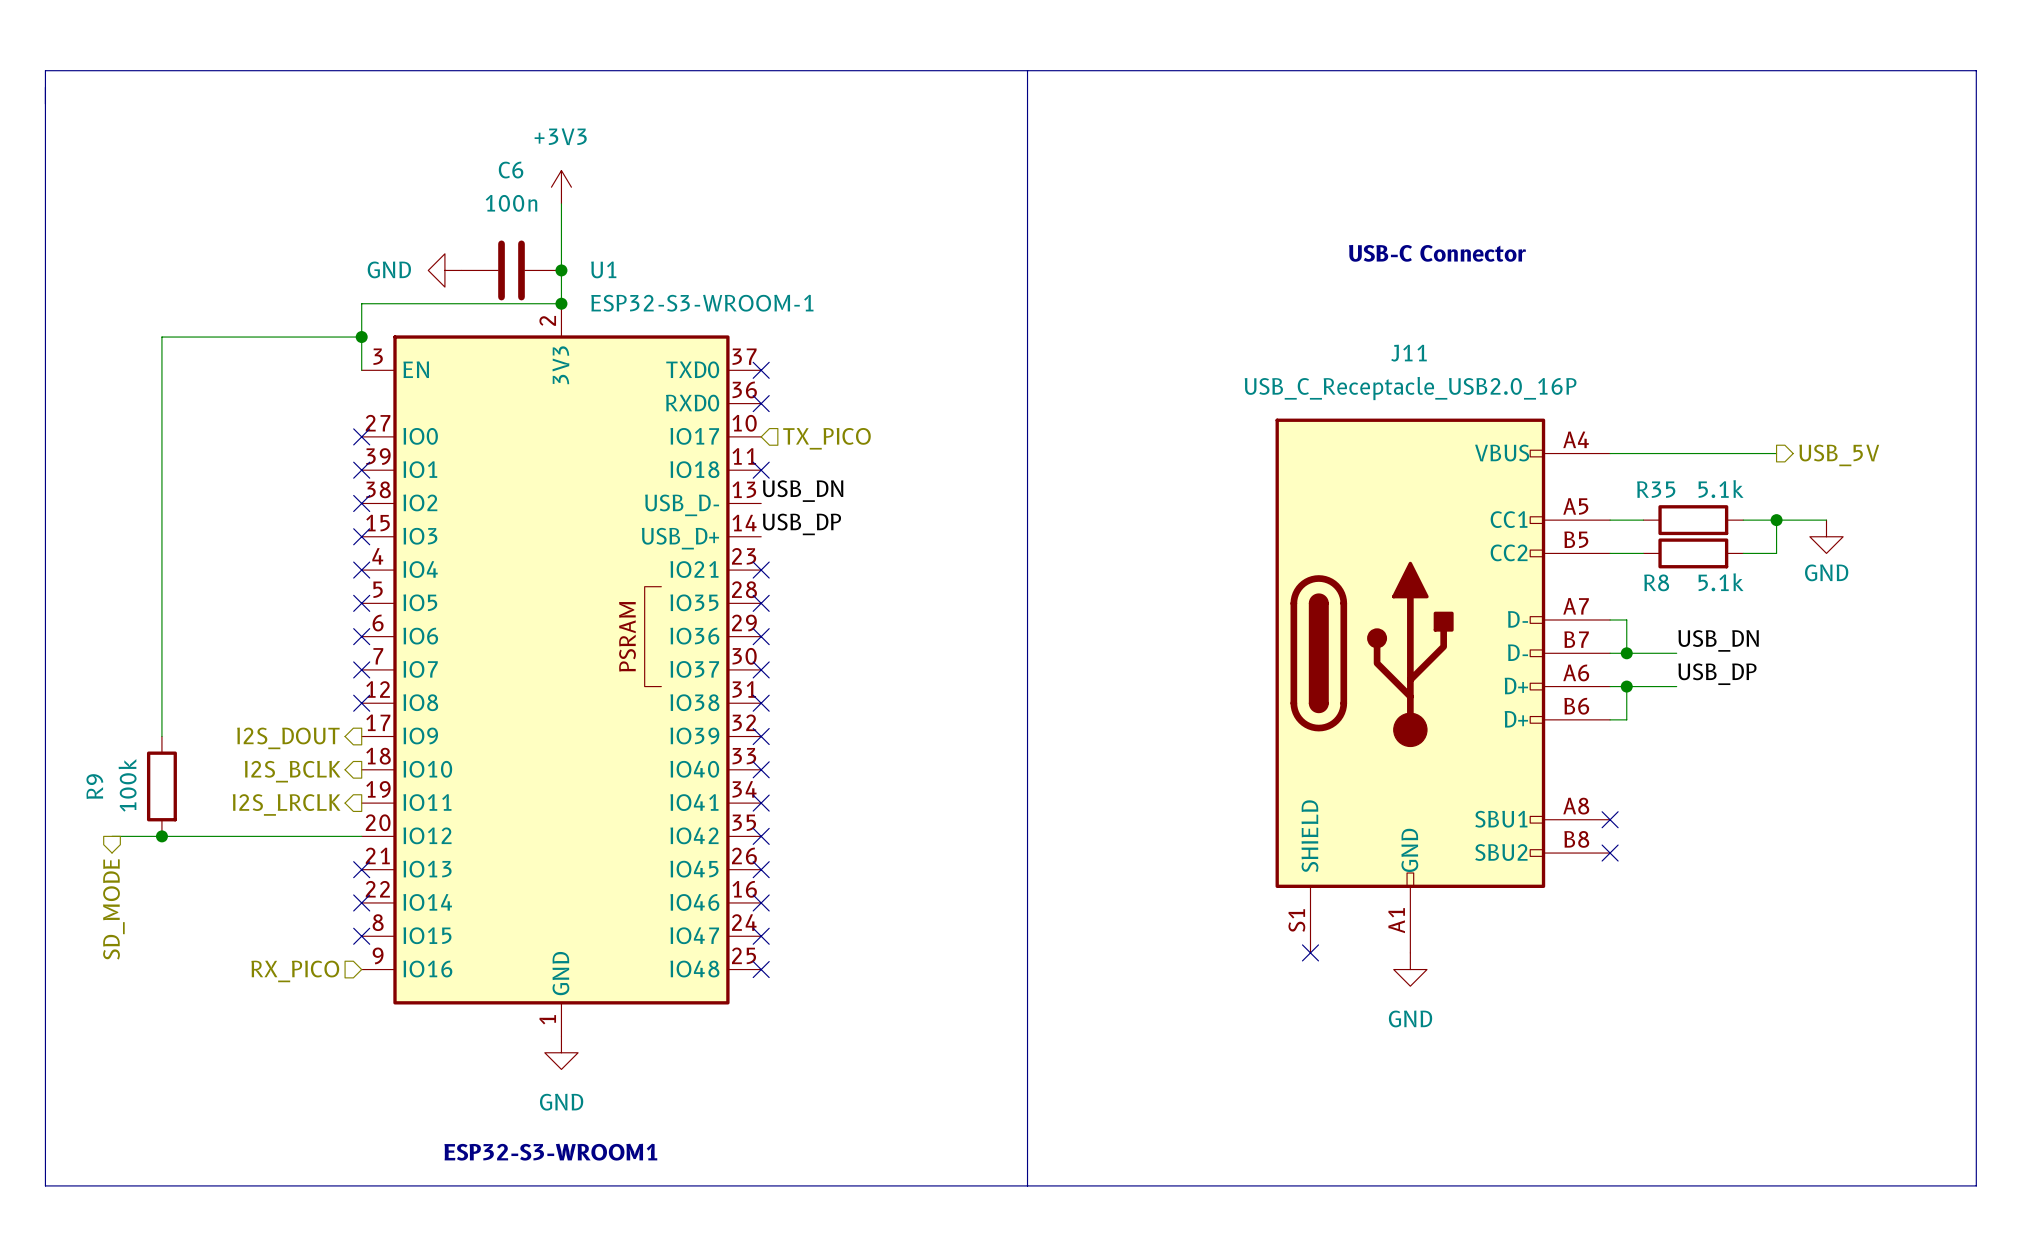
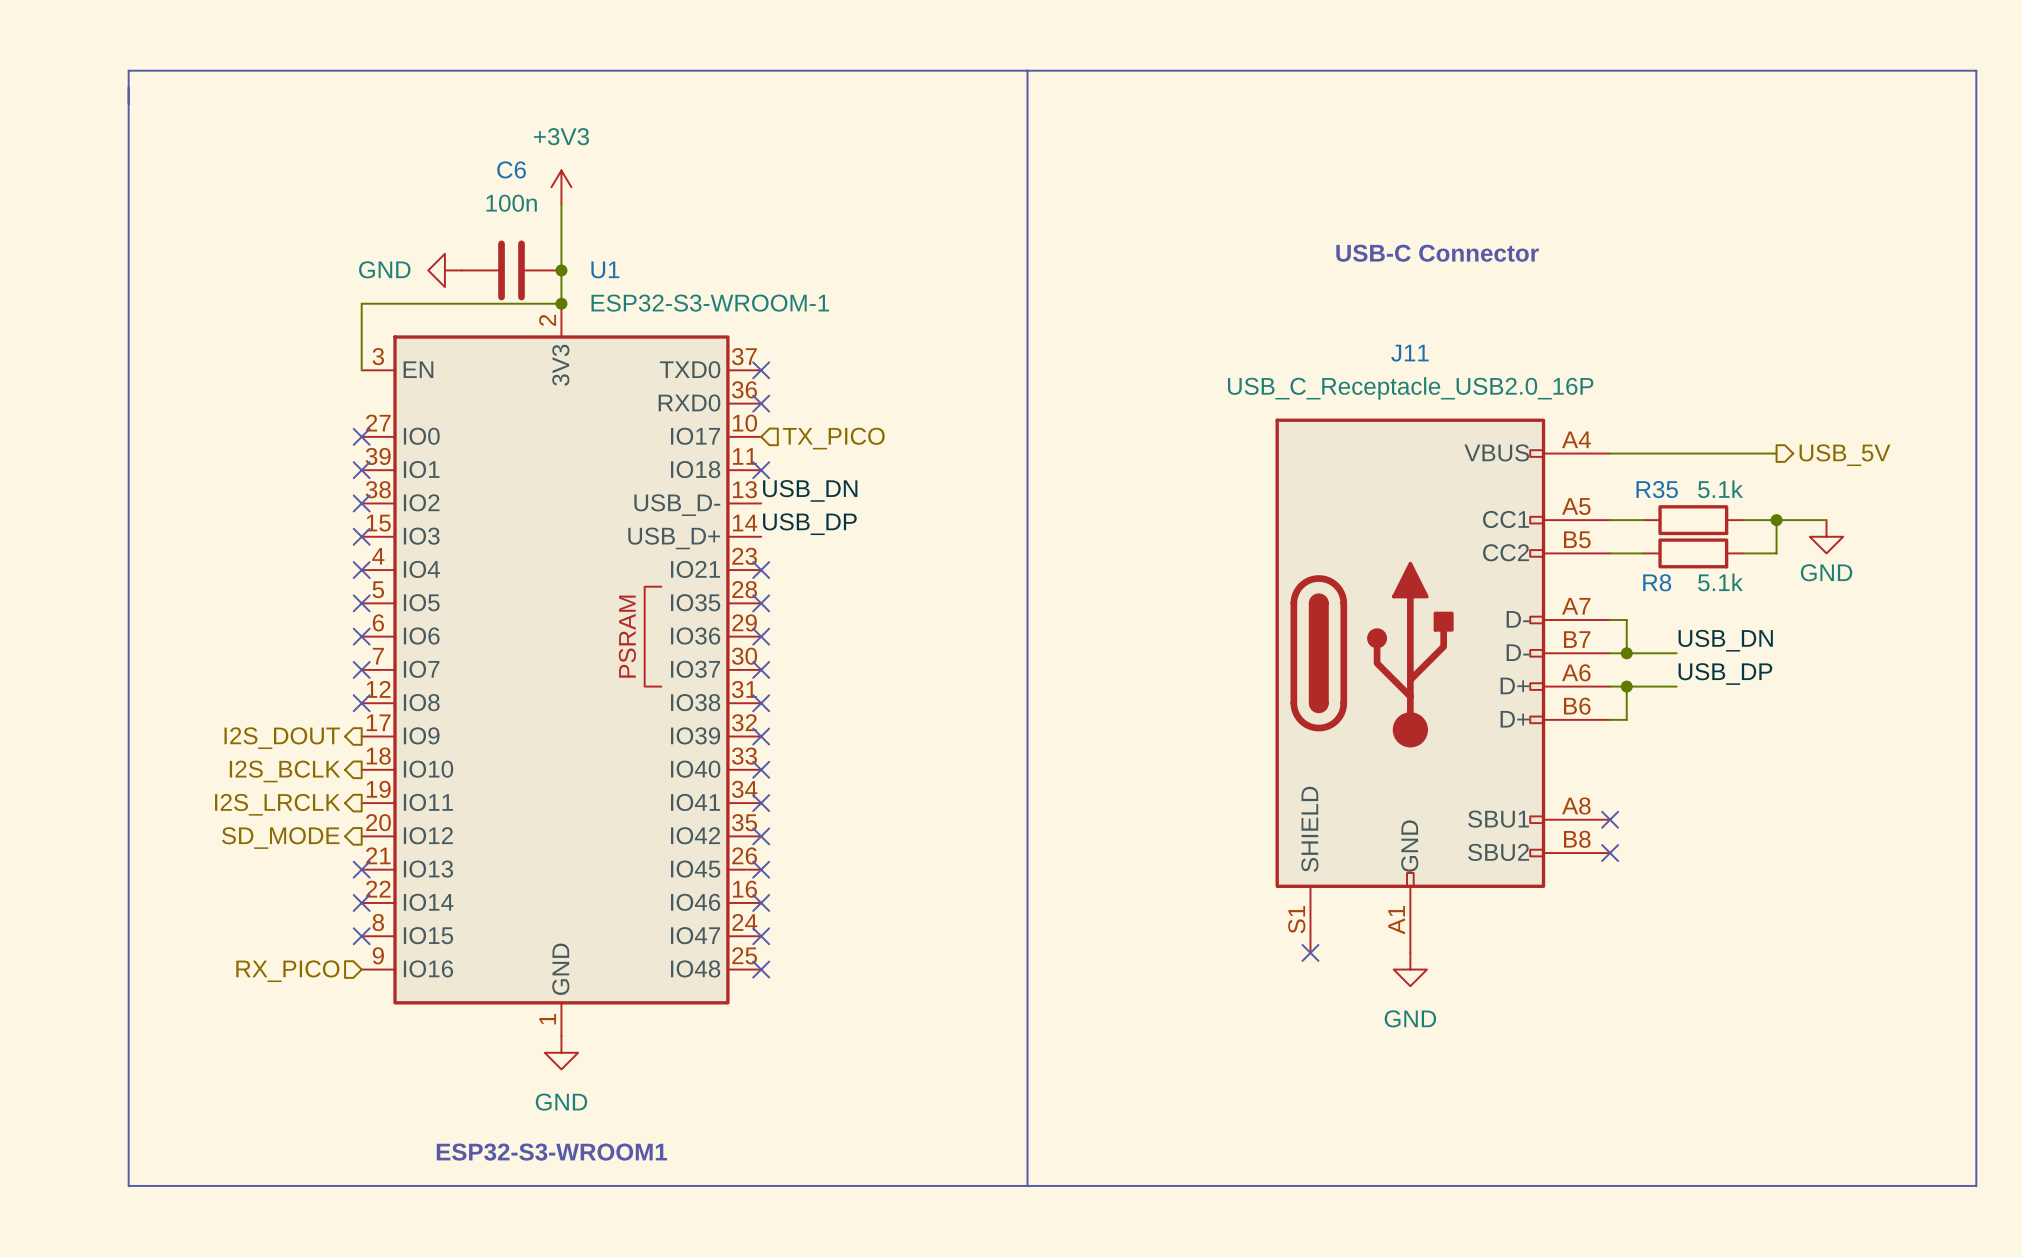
line: (128, 70) (45, 70) (45, 1185) (128, 1185) -> (128, 70) (128, 1185)
wire: (361, 337) (161, 337) (161, 736) -> none
junction: (361, 337) -> none
R9: 100k (161, 786) -> none
wire: (112, 836) (361, 836) -> none
junction: (161, 836) -> none
hierarchical label rotation: 0° (113, 909) -> 90° clockwise (280, 838)
hierarchical label position: SD_MODE (113, 909) -> SD_MODE (280, 838)

